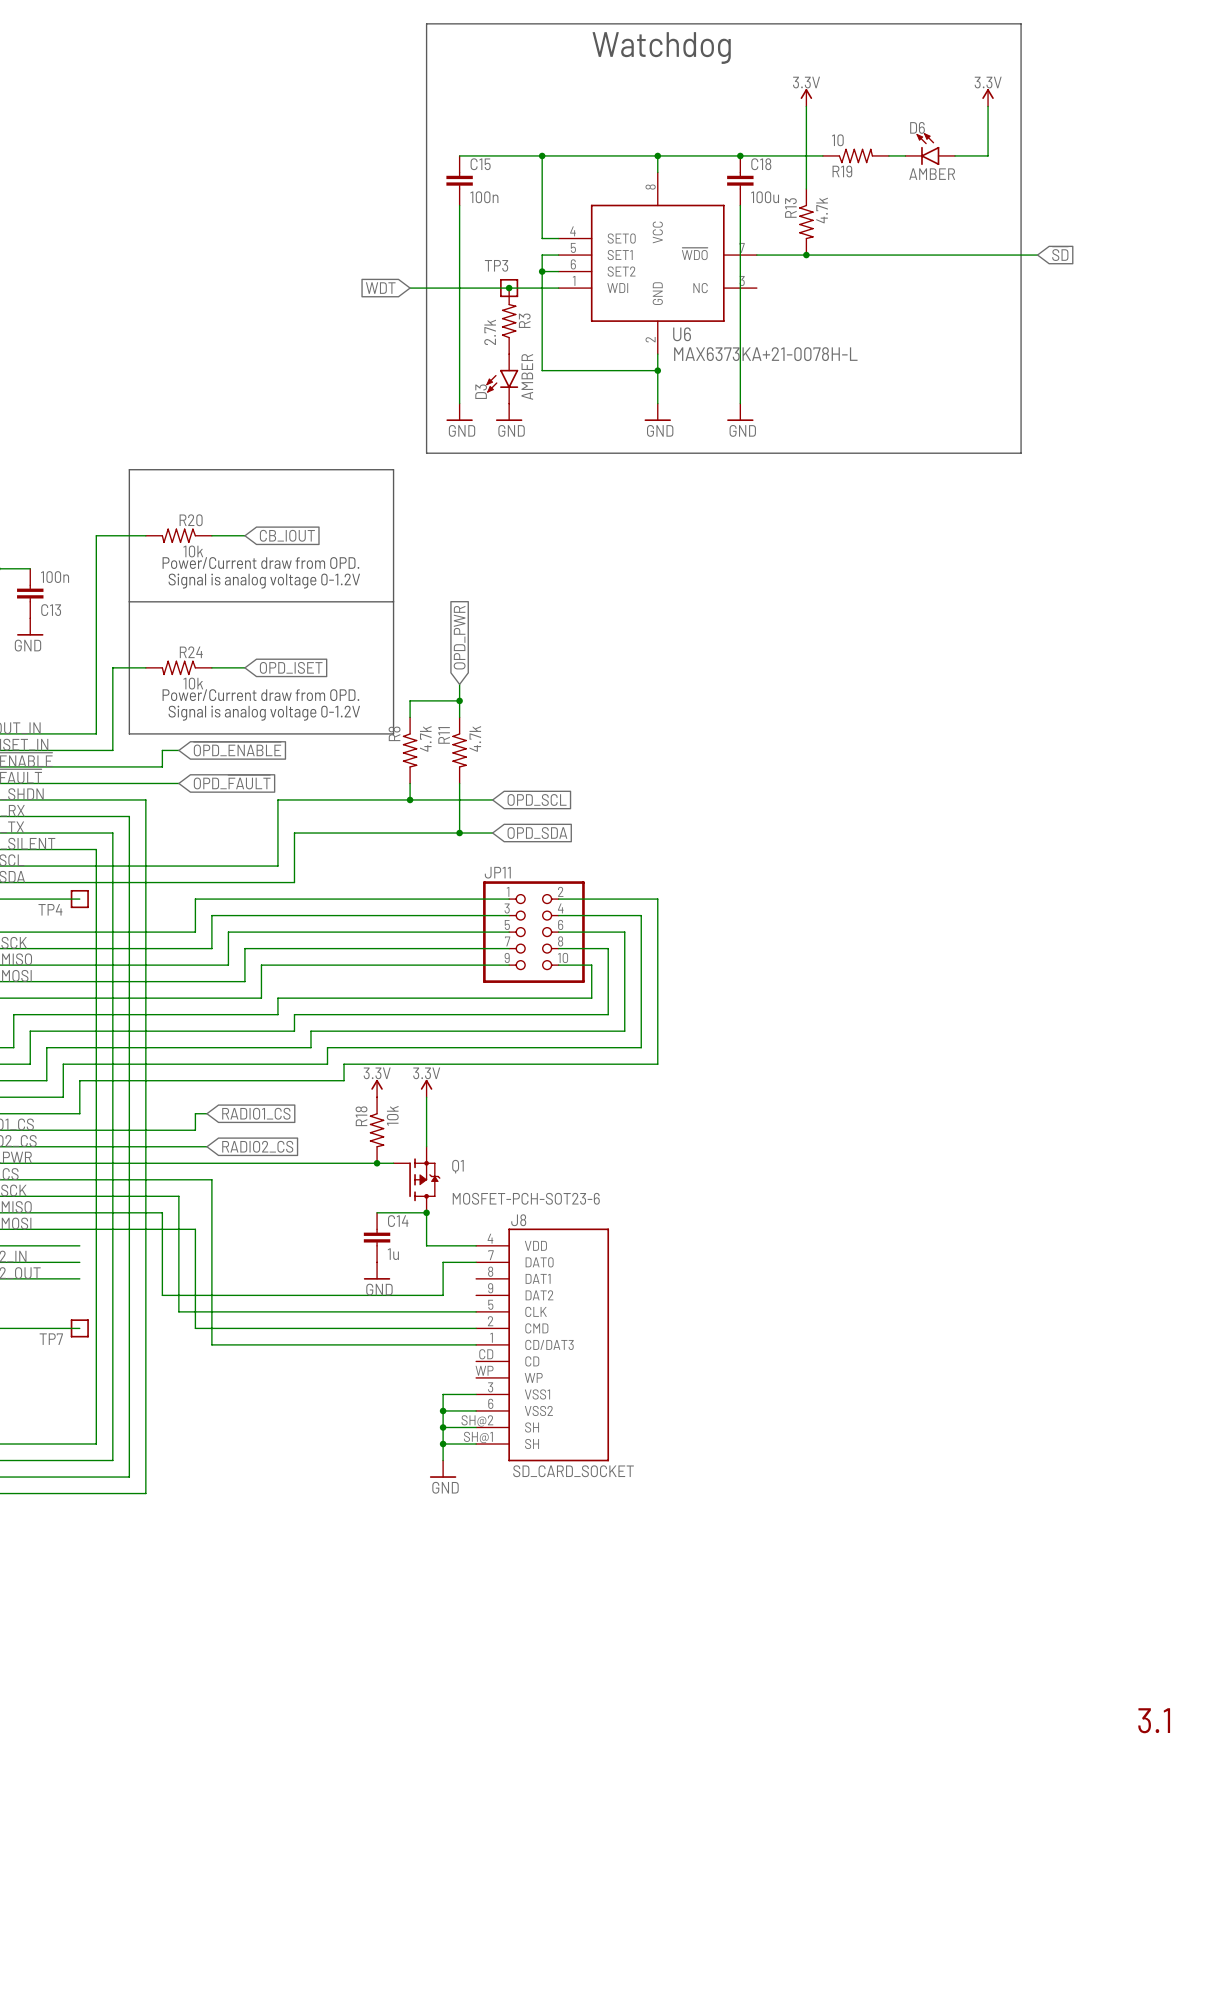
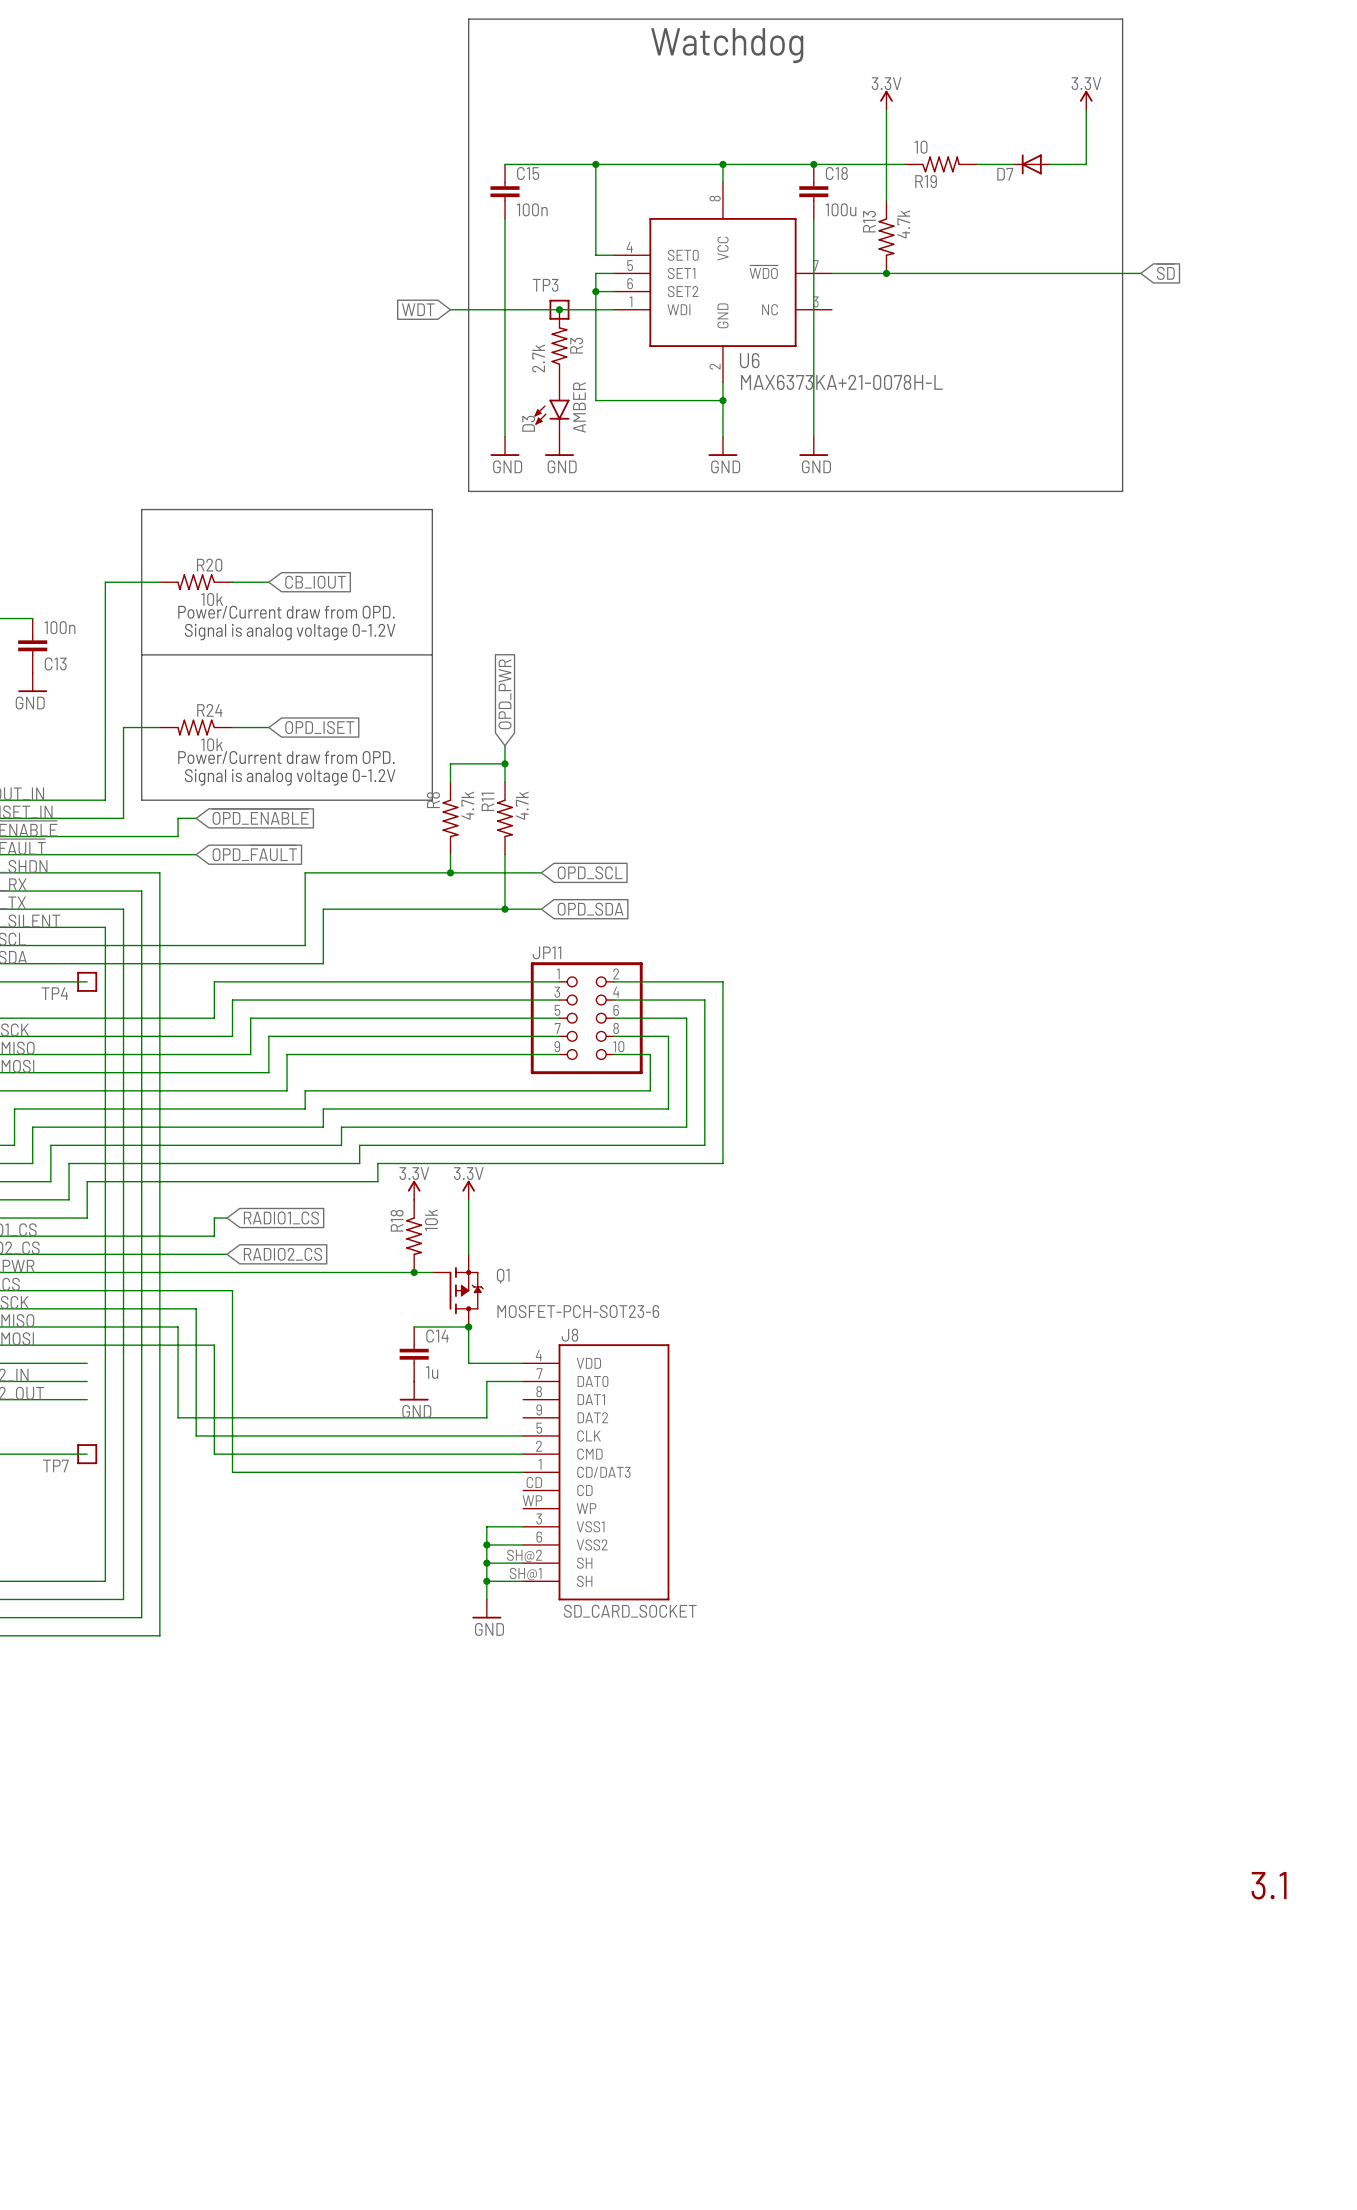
D6: AMBER (930, 149) -> none
D7: none -> (1031, 164)

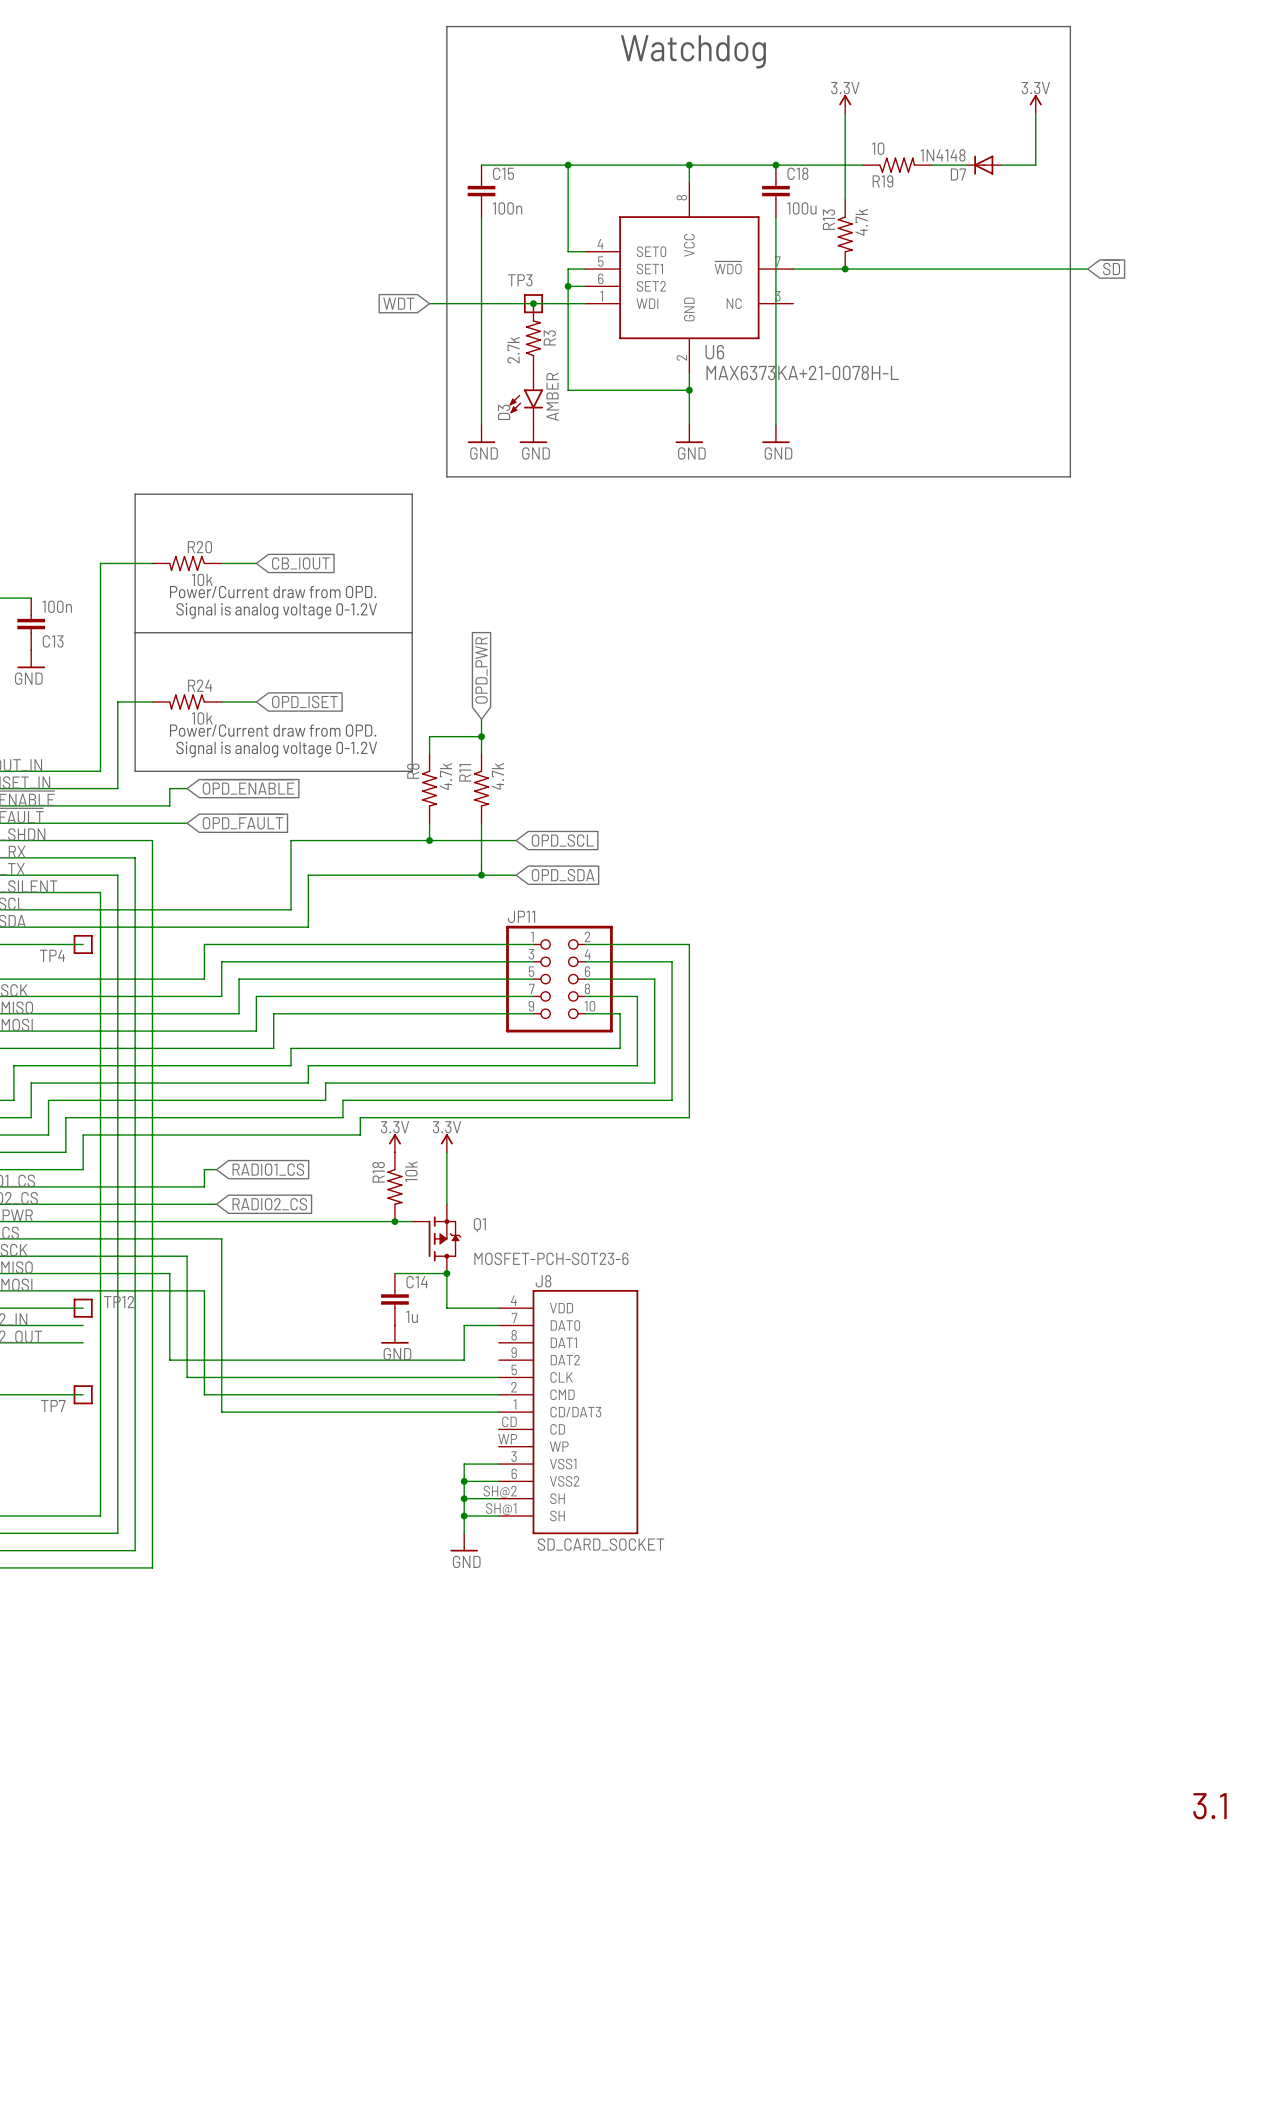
D7 value: none -> 1N4148 (943, 155)
TP12: none -> (83, 1308)

